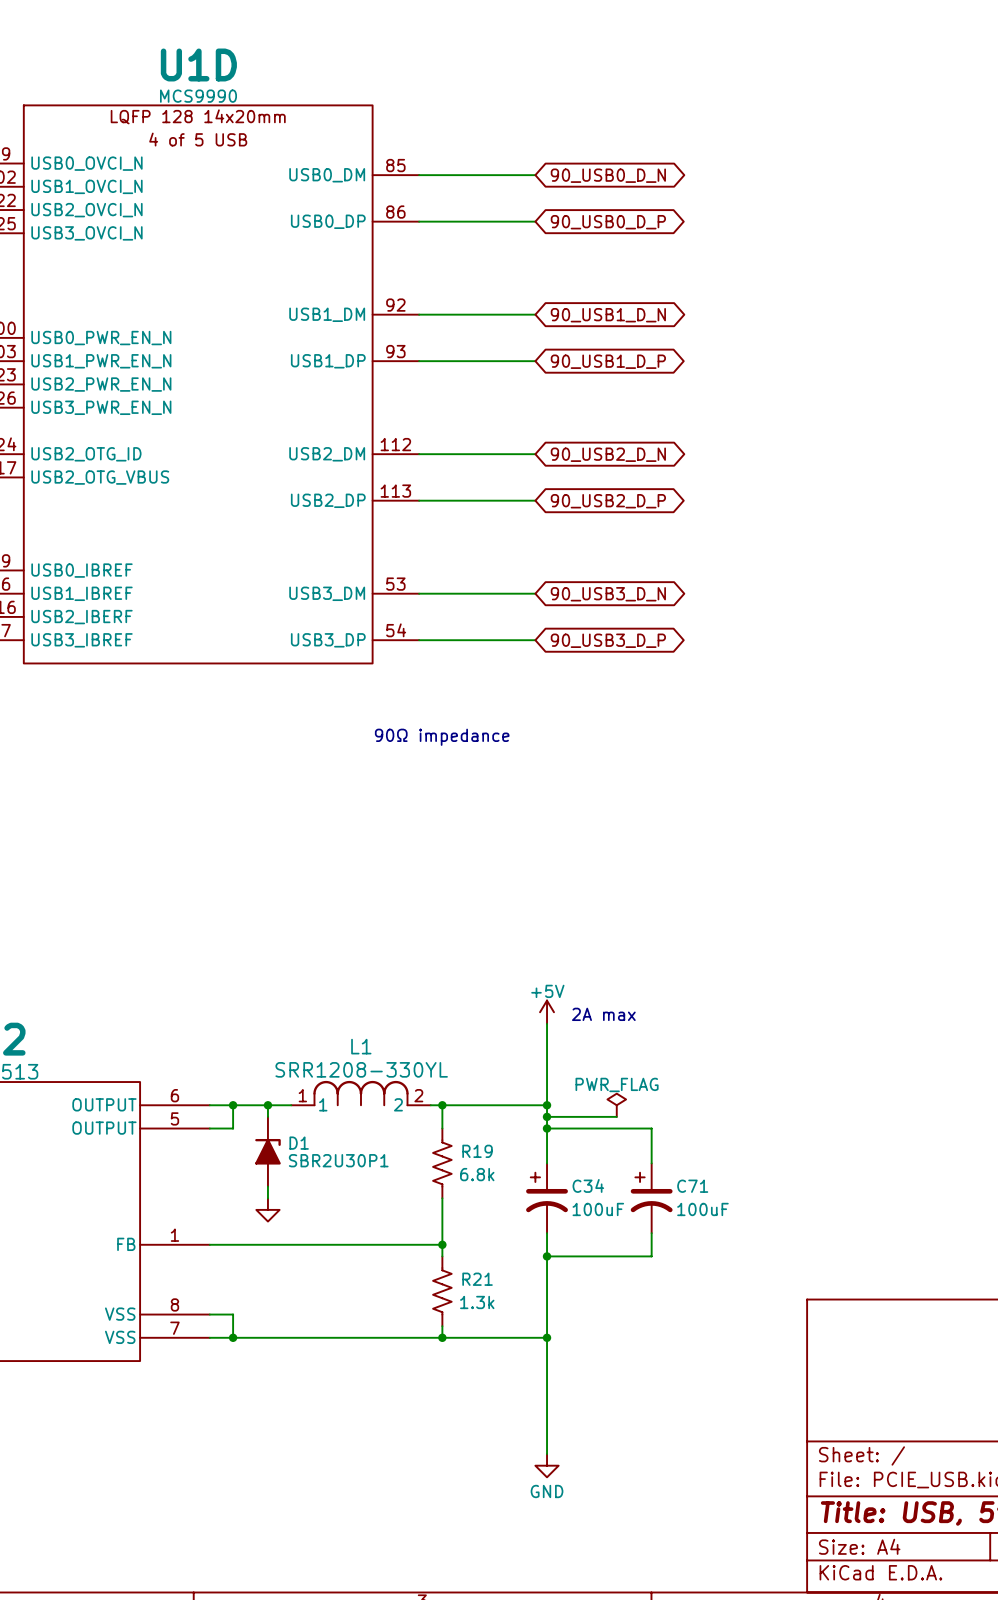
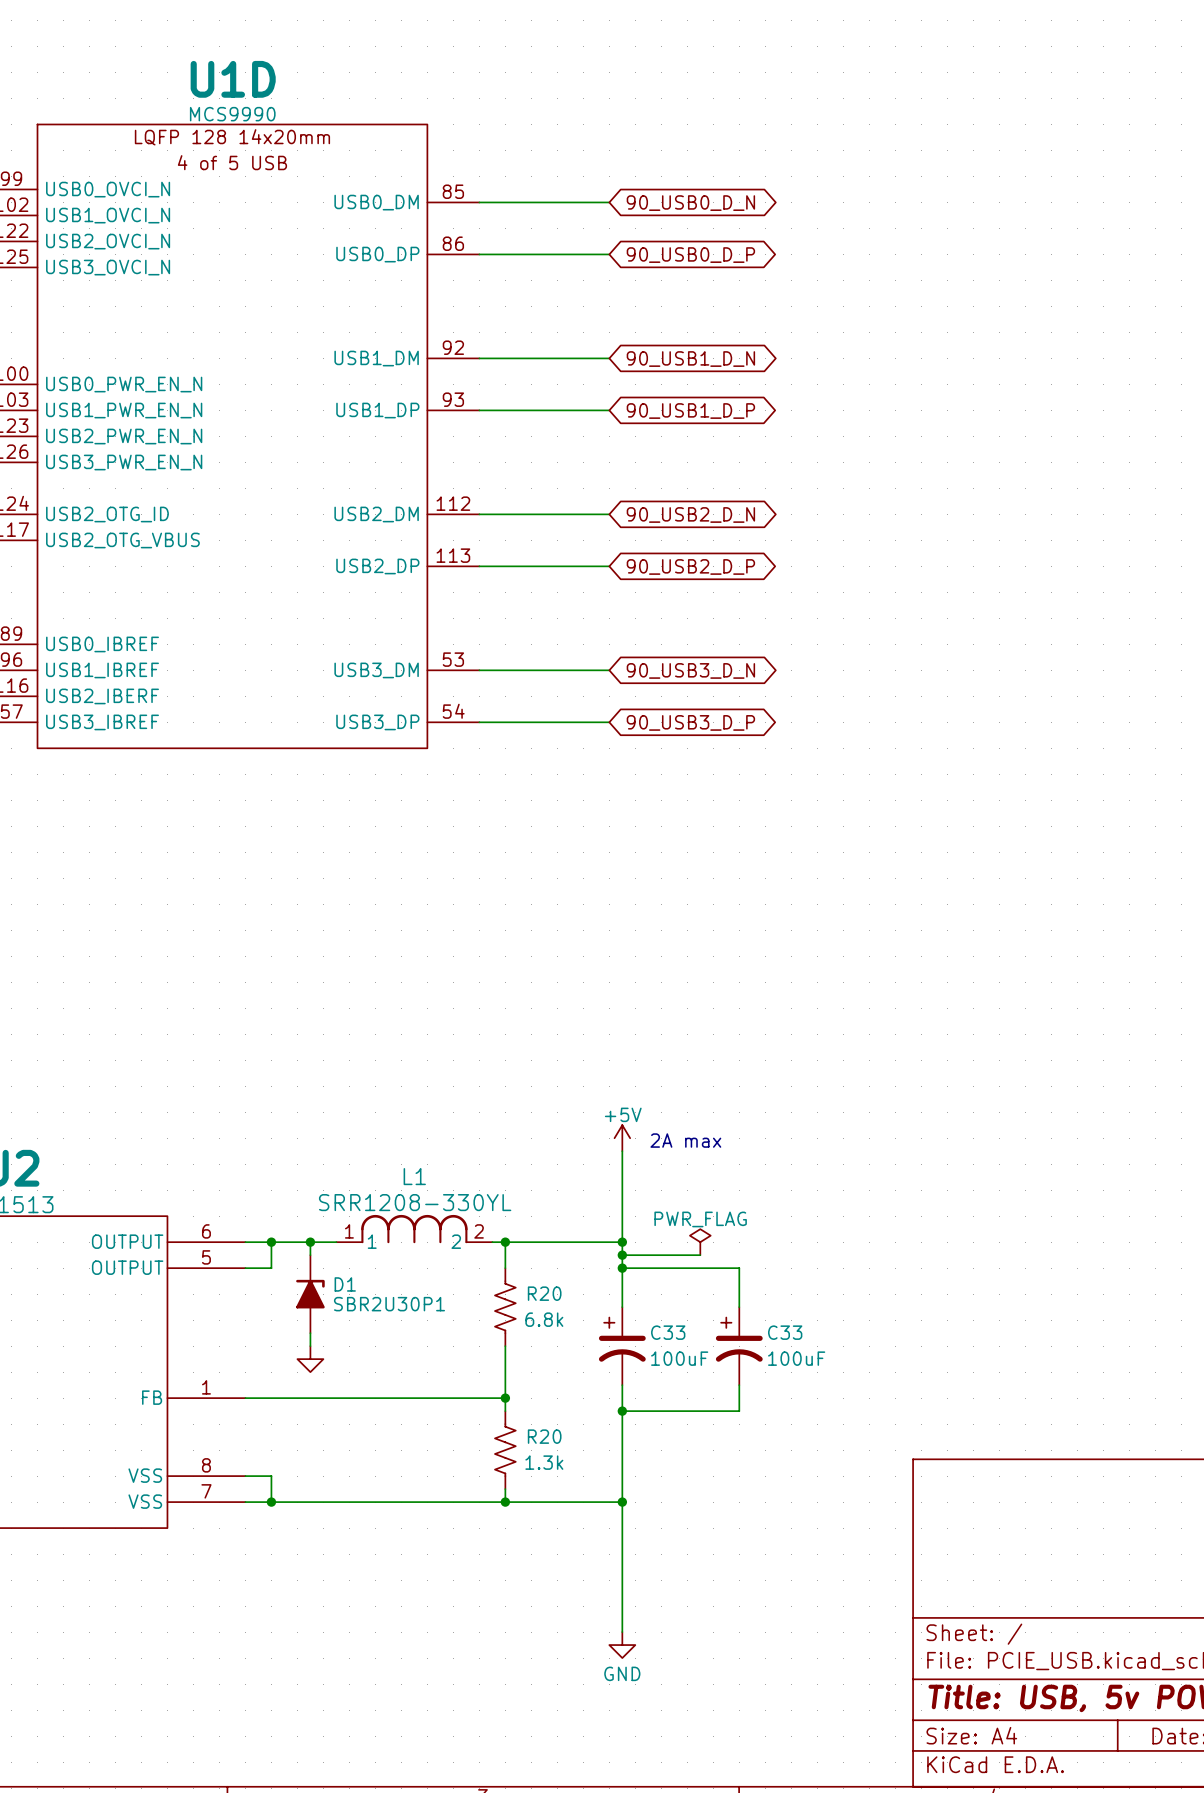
text: 90Ω impedance (442, 737) -> none
R19 name: R19 (477, 1151) -> R20 (544, 1293)
C34 name: C34 (588, 1185) -> C33 (668, 1332)
C71 name: C71 (692, 1186) -> C33 (785, 1332)
R21 name: R21 (477, 1279) -> R20 (544, 1436)

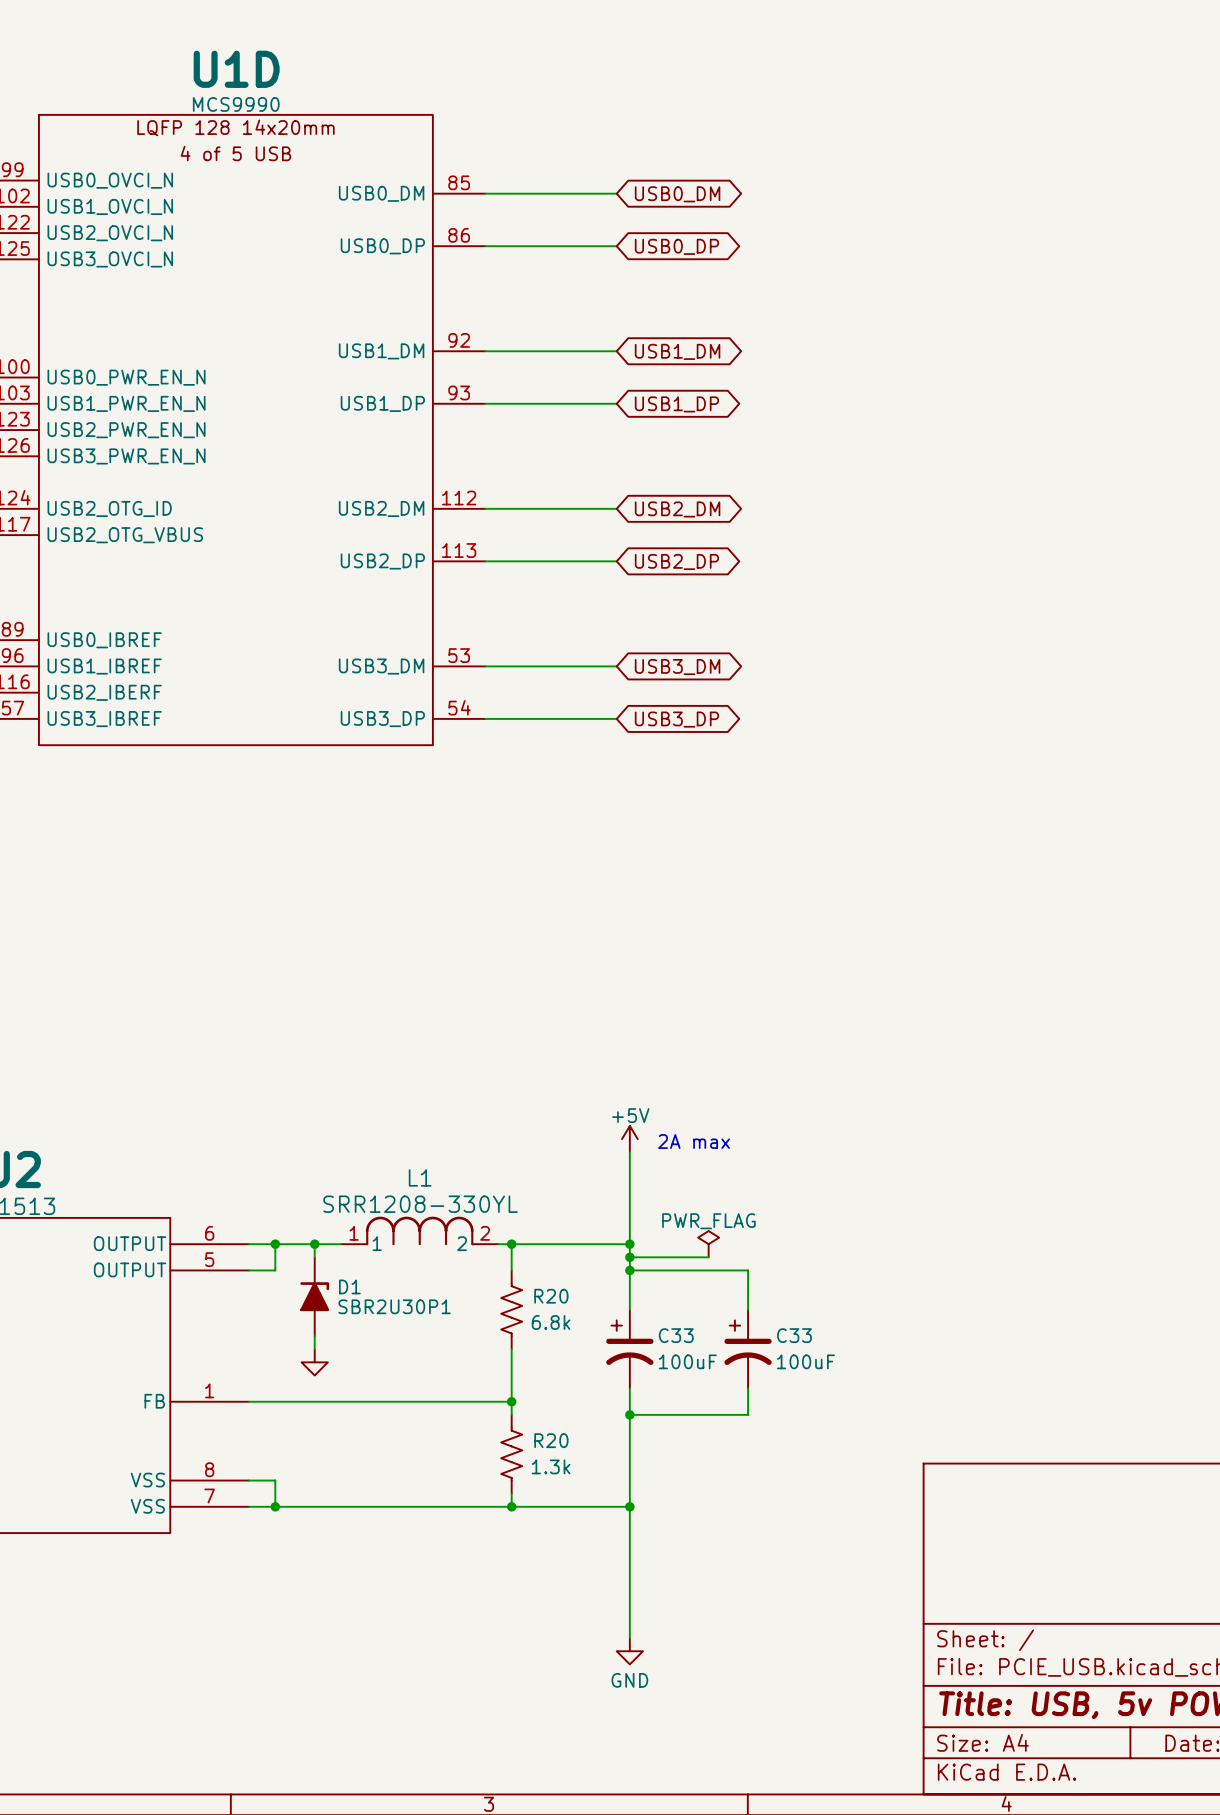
global label: 90_USB0_D_N (690, 203) -> USB0_DM (677, 194)
global label: 90_USB0_D_P (690, 255) -> USB0_DP (676, 246)
global label: 90_USB1_D_N (690, 359) -> USB1_DM (677, 351)
global label: 90_USB1_D_P (690, 411) -> USB1_DP (676, 404)
global label: 90_USB2_D_N (690, 514) -> USB2_DM (677, 509)
global label: 90_USB2_D_P (690, 566) -> USB2_DP (676, 561)
global label: 90_USB3_D_N (690, 670) -> USB3_DM (677, 667)
global label: 90_USB3_D_P (690, 722) -> USB3_DP (676, 719)

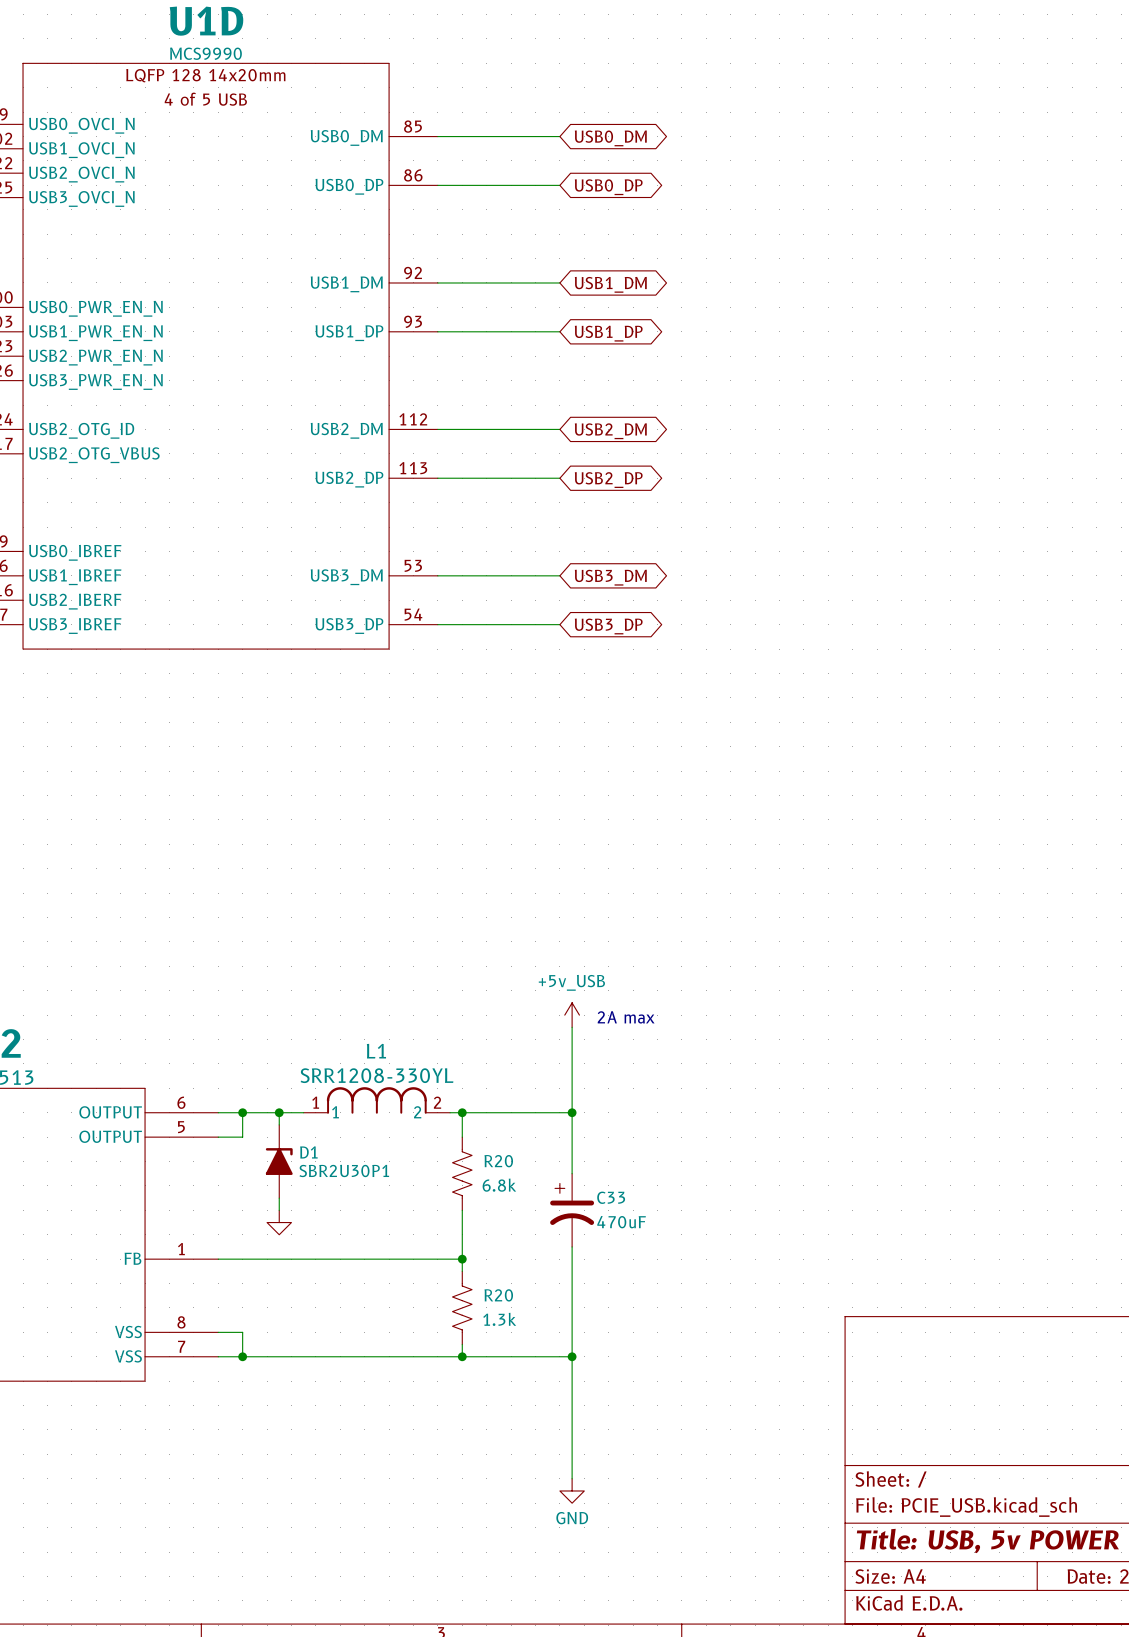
power symbol: +5V (629, 1139) -> +5v_USB (572, 1015)
power symbol: PWR_FLAG (708, 1244) -> none
wire: (629, 1257) (708, 1257) -> none
junction: (629, 1257) -> none
wire: (629, 1270) (748, 1270) (748, 1309) -> none
junction: (629, 1270) -> none
C33: 100uF (748, 1349) -> none
C33 value: 100uF (687, 1361) -> 470uF (621, 1222)
wire: (748, 1388) (748, 1414) (629, 1414) -> none
junction: (629, 1414) -> none

